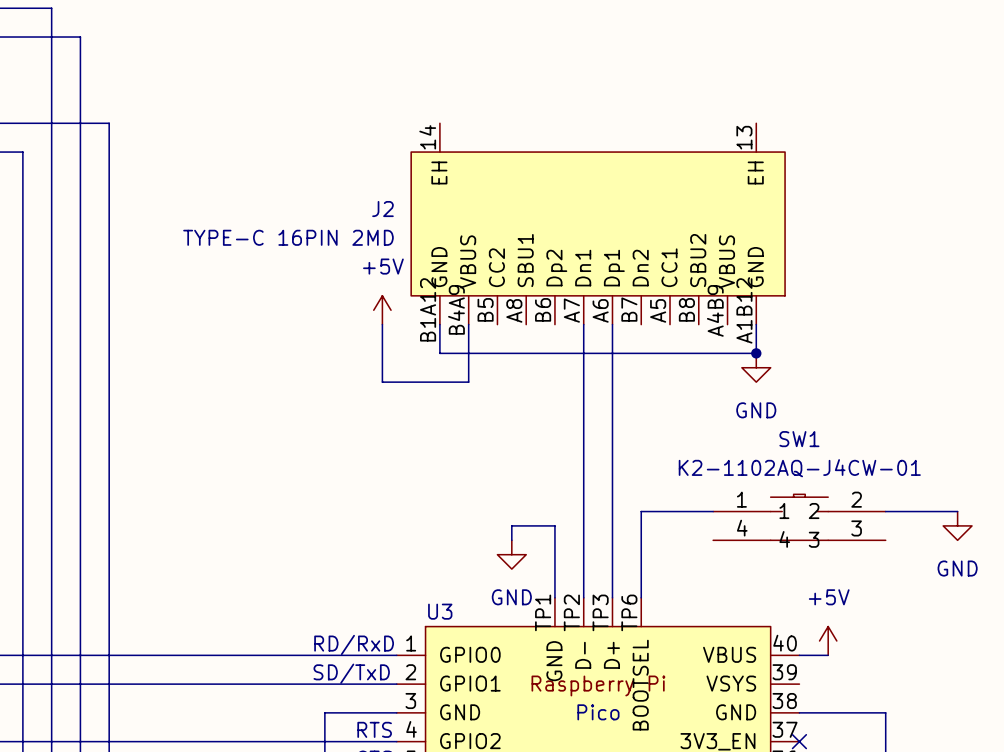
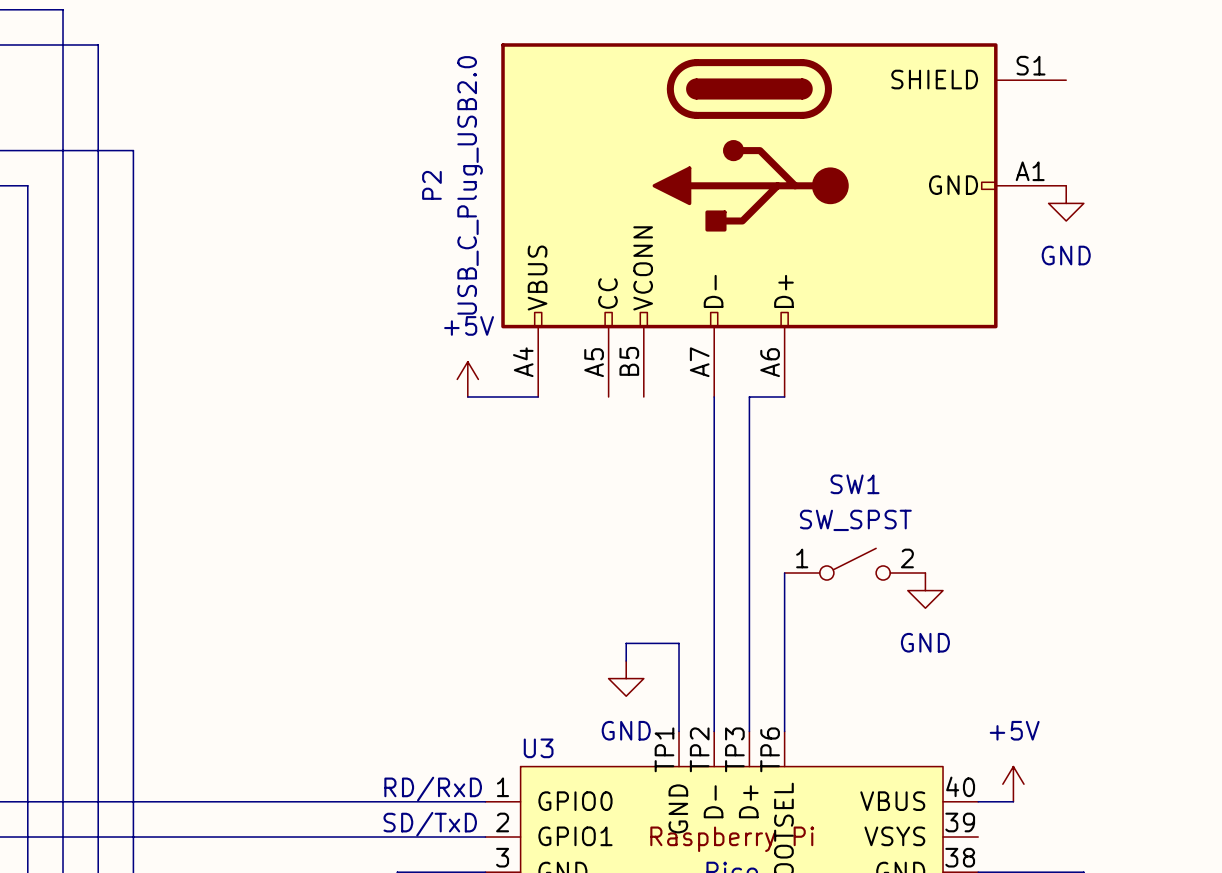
power symbol: none -> GND (1066, 203)
P2: none -> USB_C_Plug_USB2.0 (783, 220)
J2: TYPE-C 16PIN 2MD (598, 223) -> none
wire: (382, 324) (382, 382) (468, 382) (468, 324) -> (467, 397) (538, 397)
wire: (439, 324) (439, 353) (756, 353) (756, 324) -> none
wire: none -> (749, 397) (784, 397)
junction: (756, 353) -> none
power symbol: GND (756, 367) -> none
SW1 value: K2-1102AQ-J4CW-01 (799, 468) -> SW_SPST (855, 520)
power symbol: none -> GND (925, 590)
SW1 symbol: [713, 494, 886, 541] -> [784, 548, 926, 581]
wire: (641, 511) (713, 511) -> (784, 625) (784, 573)
wire: (885, 511) (957, 511) -> none
power symbol: GND (957, 525) -> none

